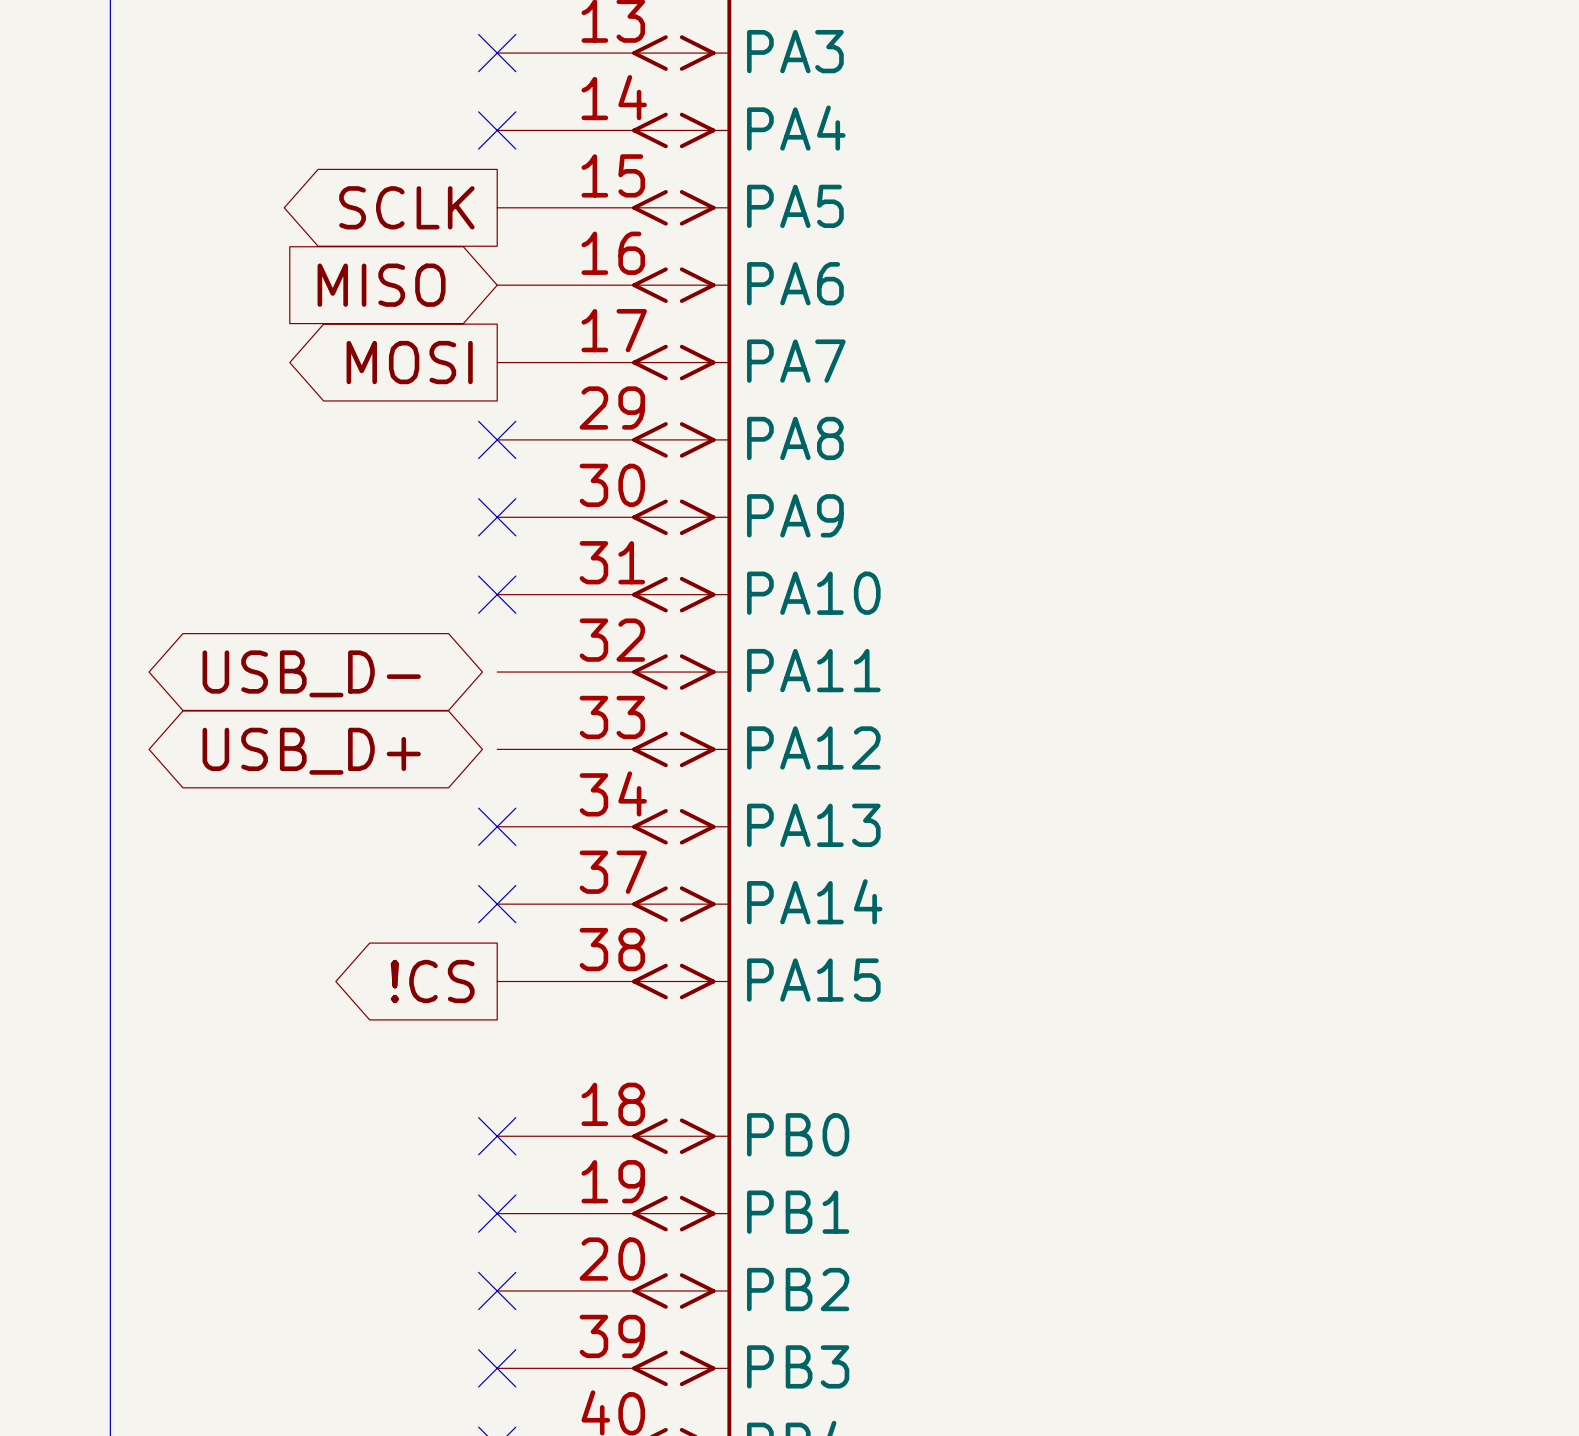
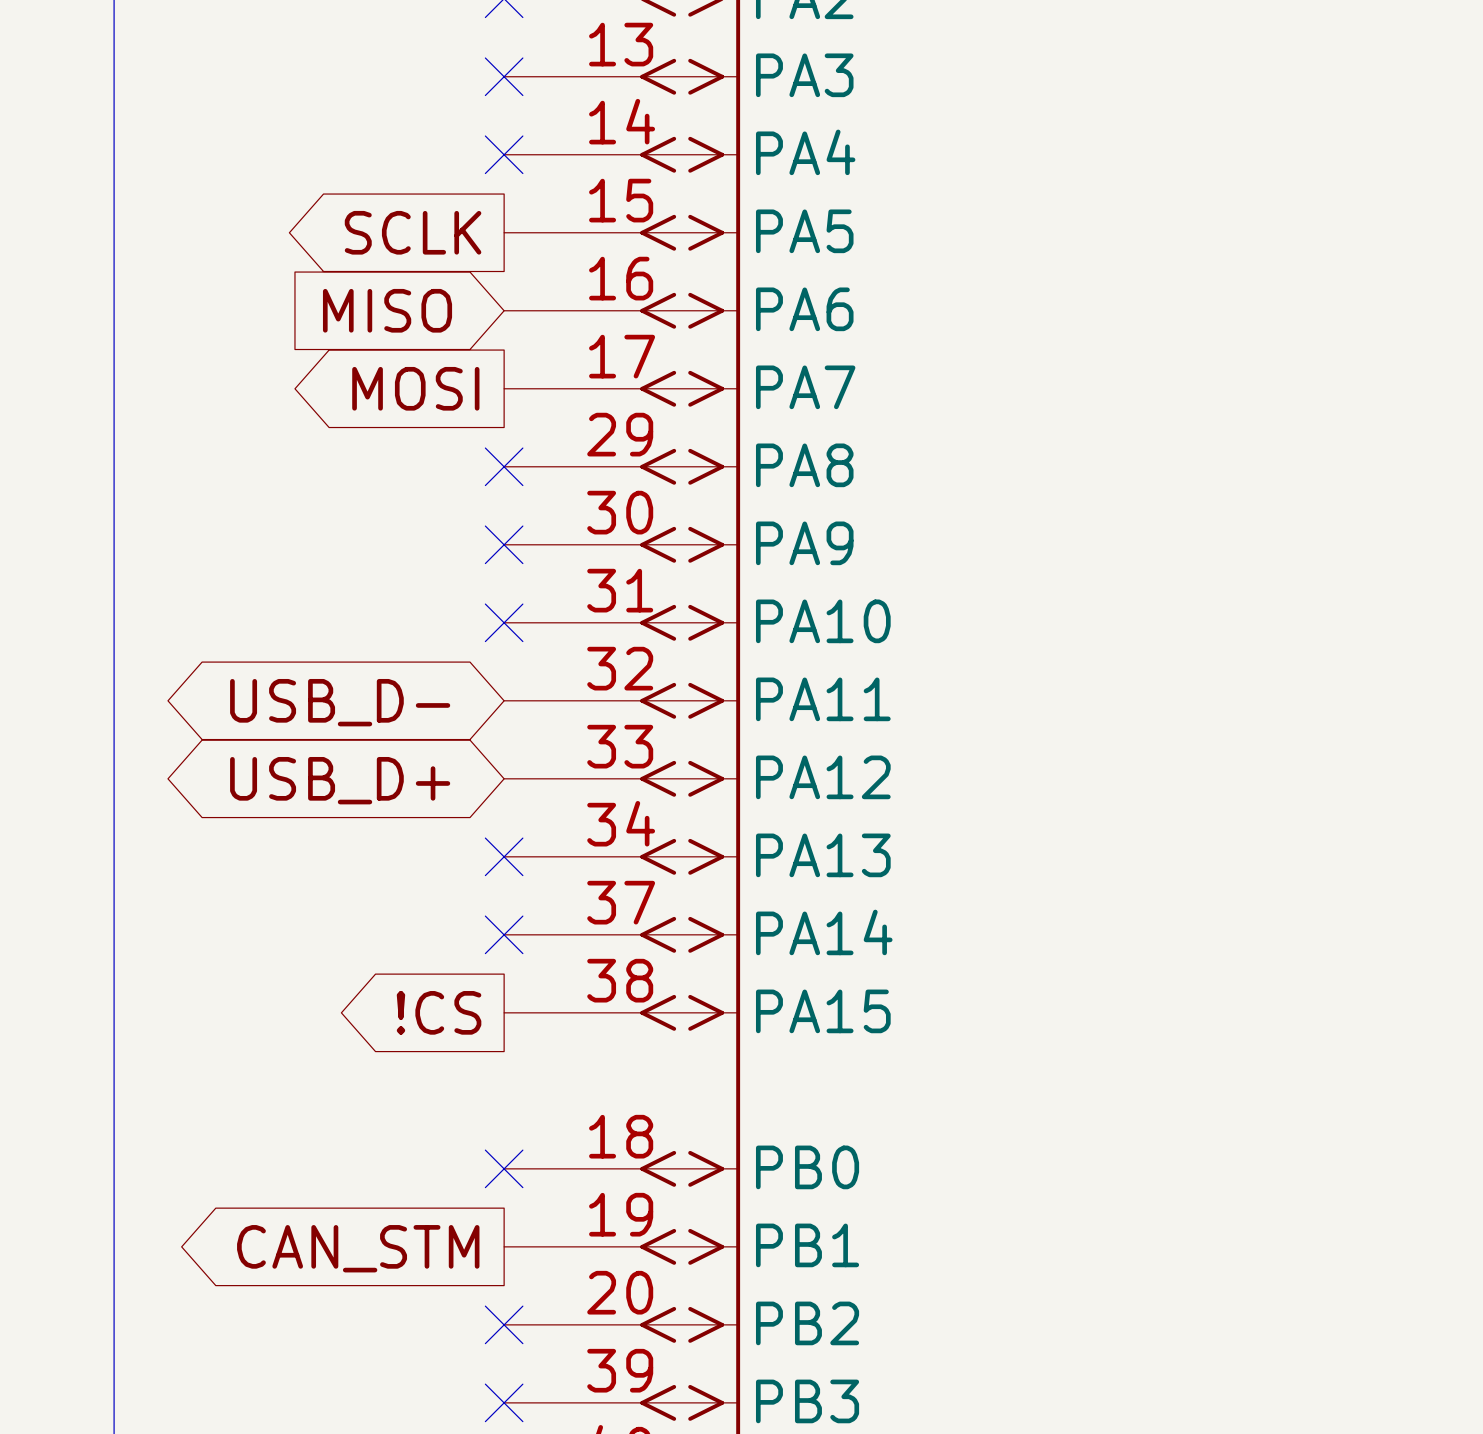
global label rotation: 0° (311, 673) -> 180° (340, 702)
global label rotation: 0° (311, 751) -> 180° (340, 780)
no-connect mark: (497, 1213) -> none
global label: none -> CAN_STM (358, 1248)

